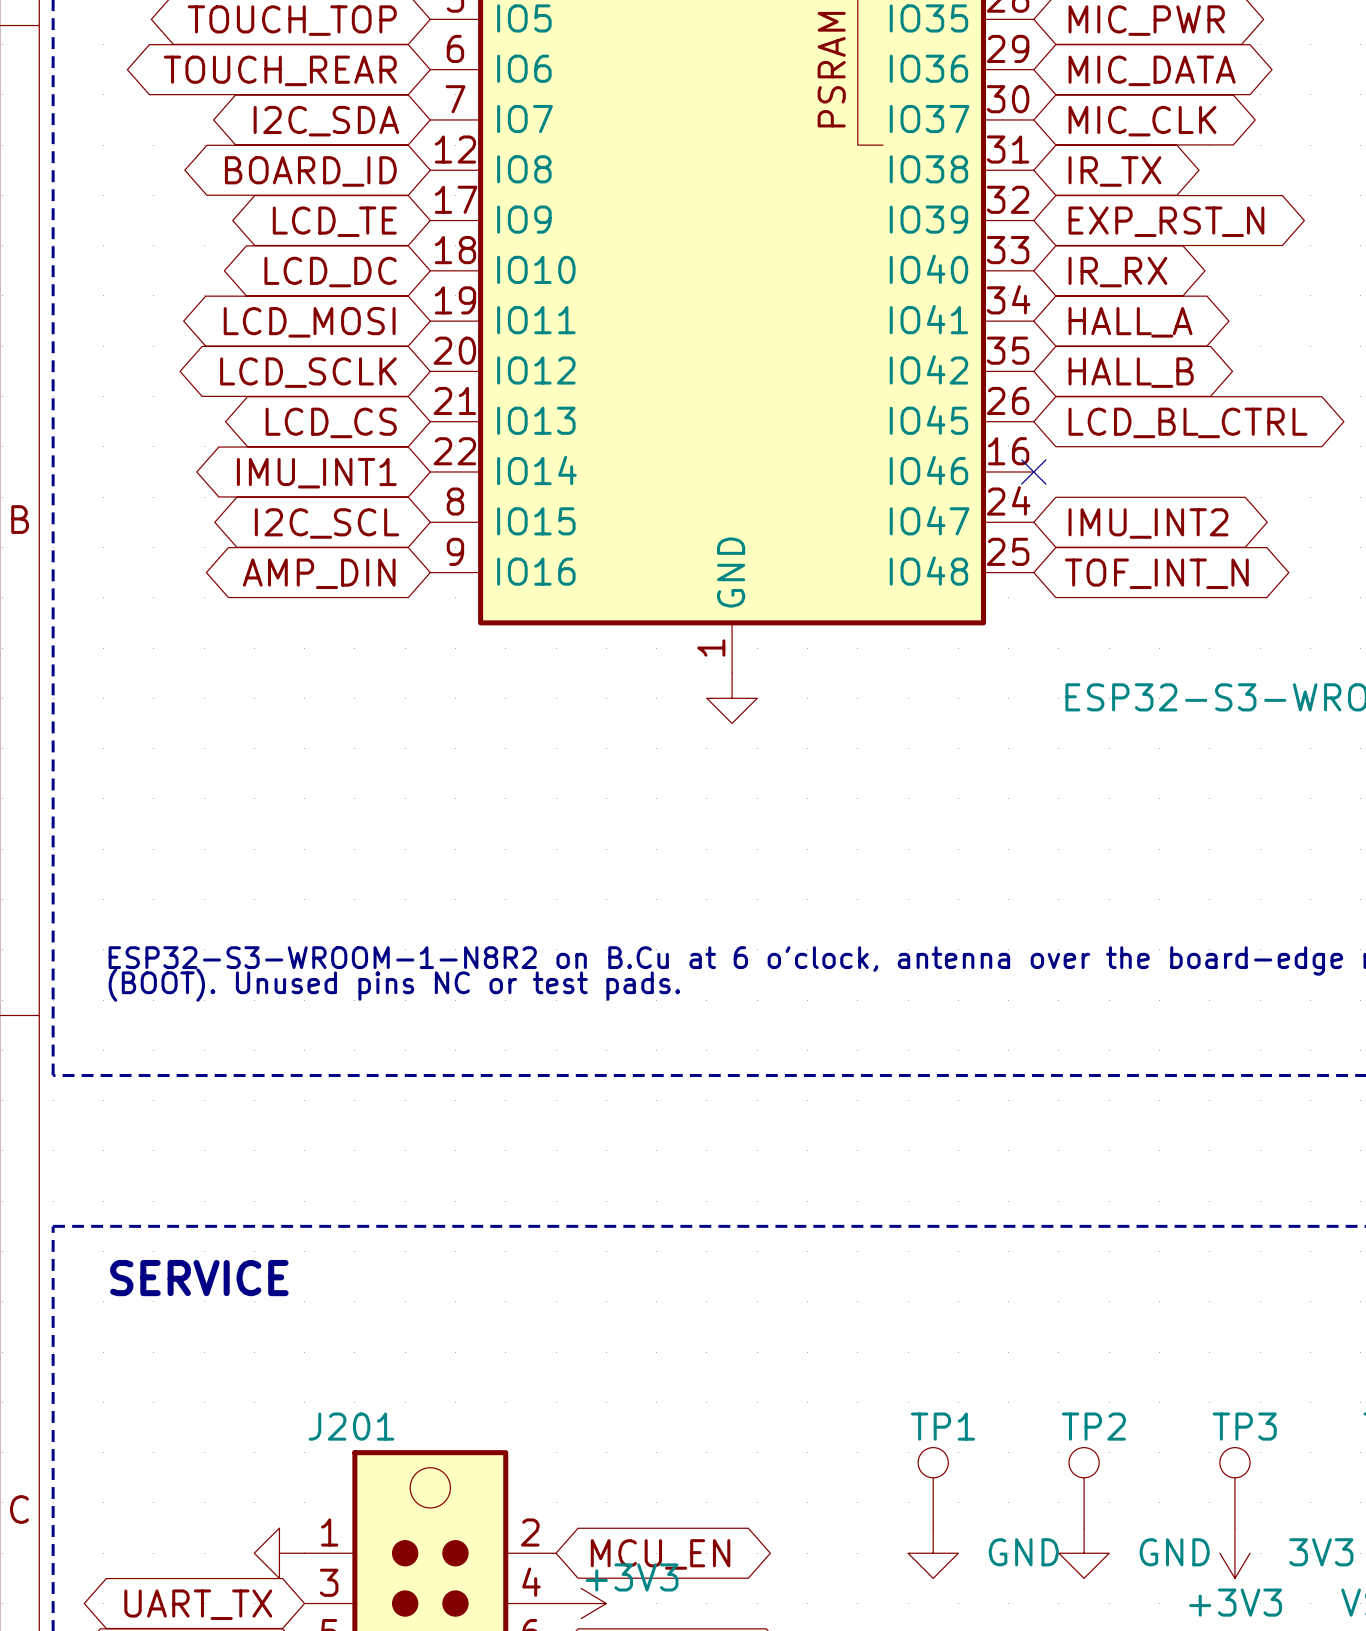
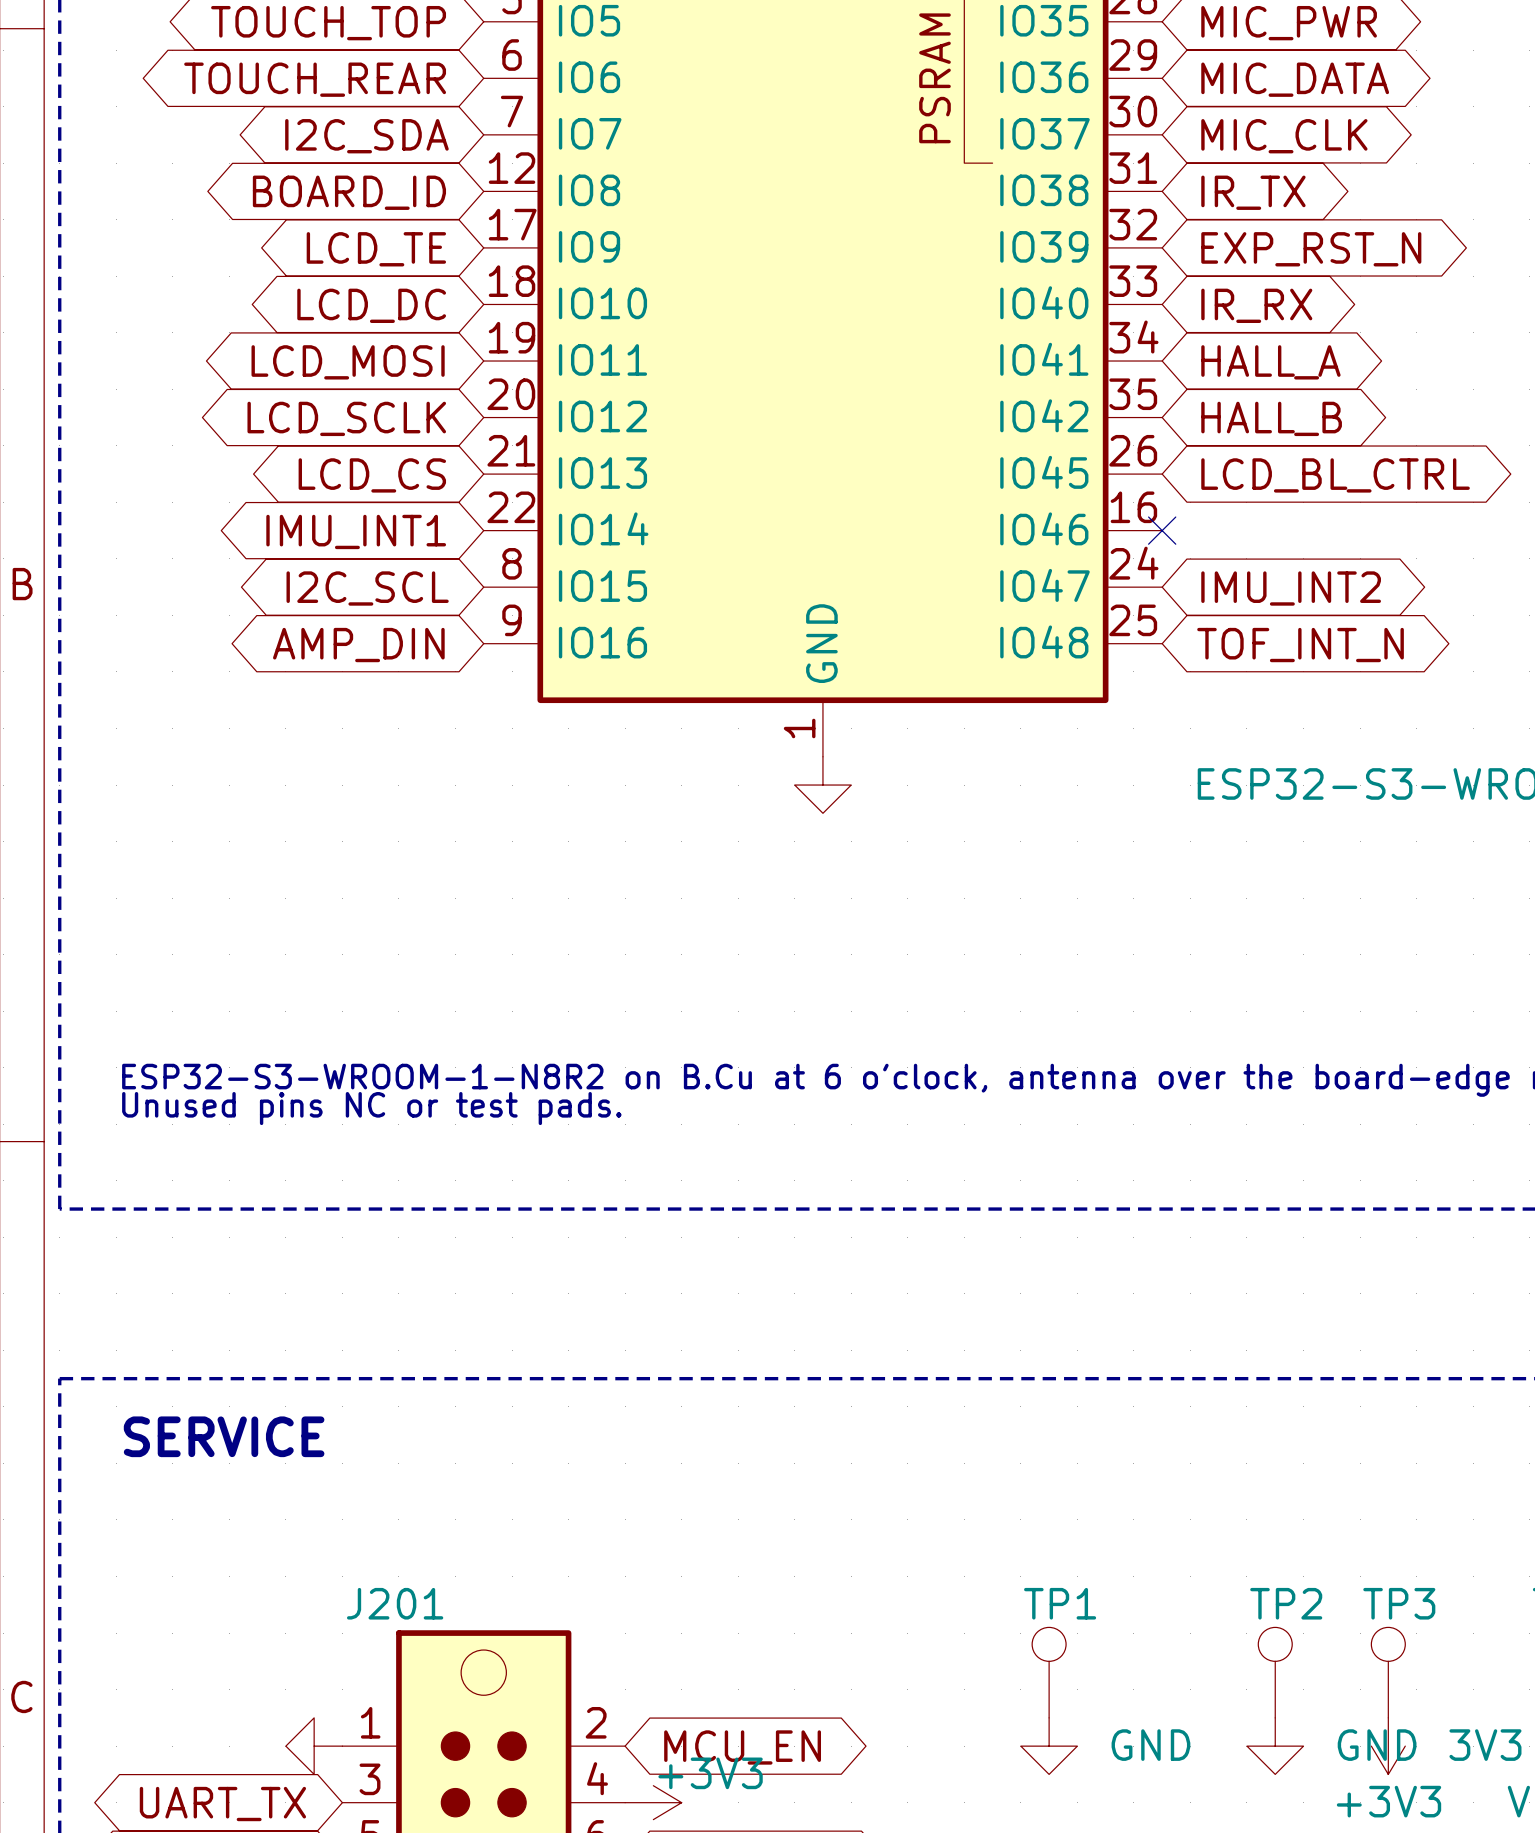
text: (BOOT). Unused pins NC or test pads. (394, 985) -> Unused pins NC or test pads. (371, 1108)
TP2 position: (1084, 1487) -> (1275, 1672)
power symbol position: (1084, 1553) -> (1275, 1746)

